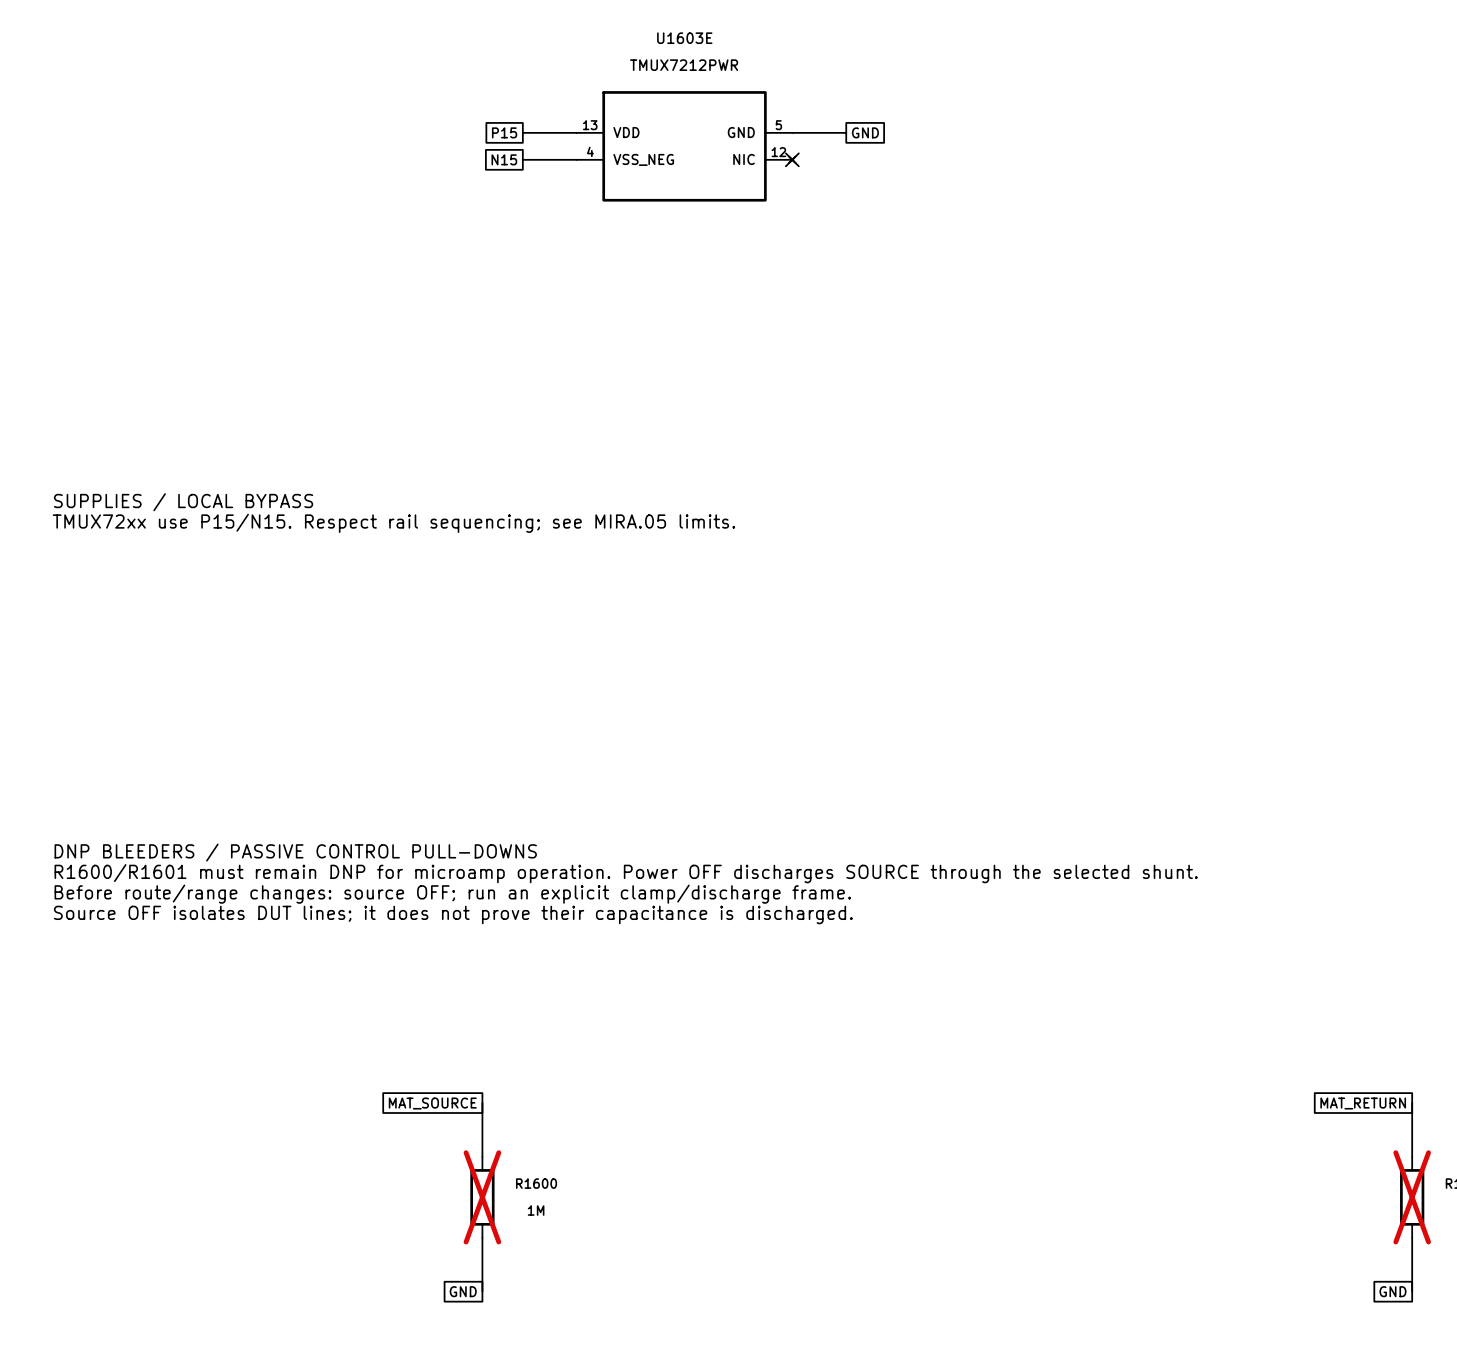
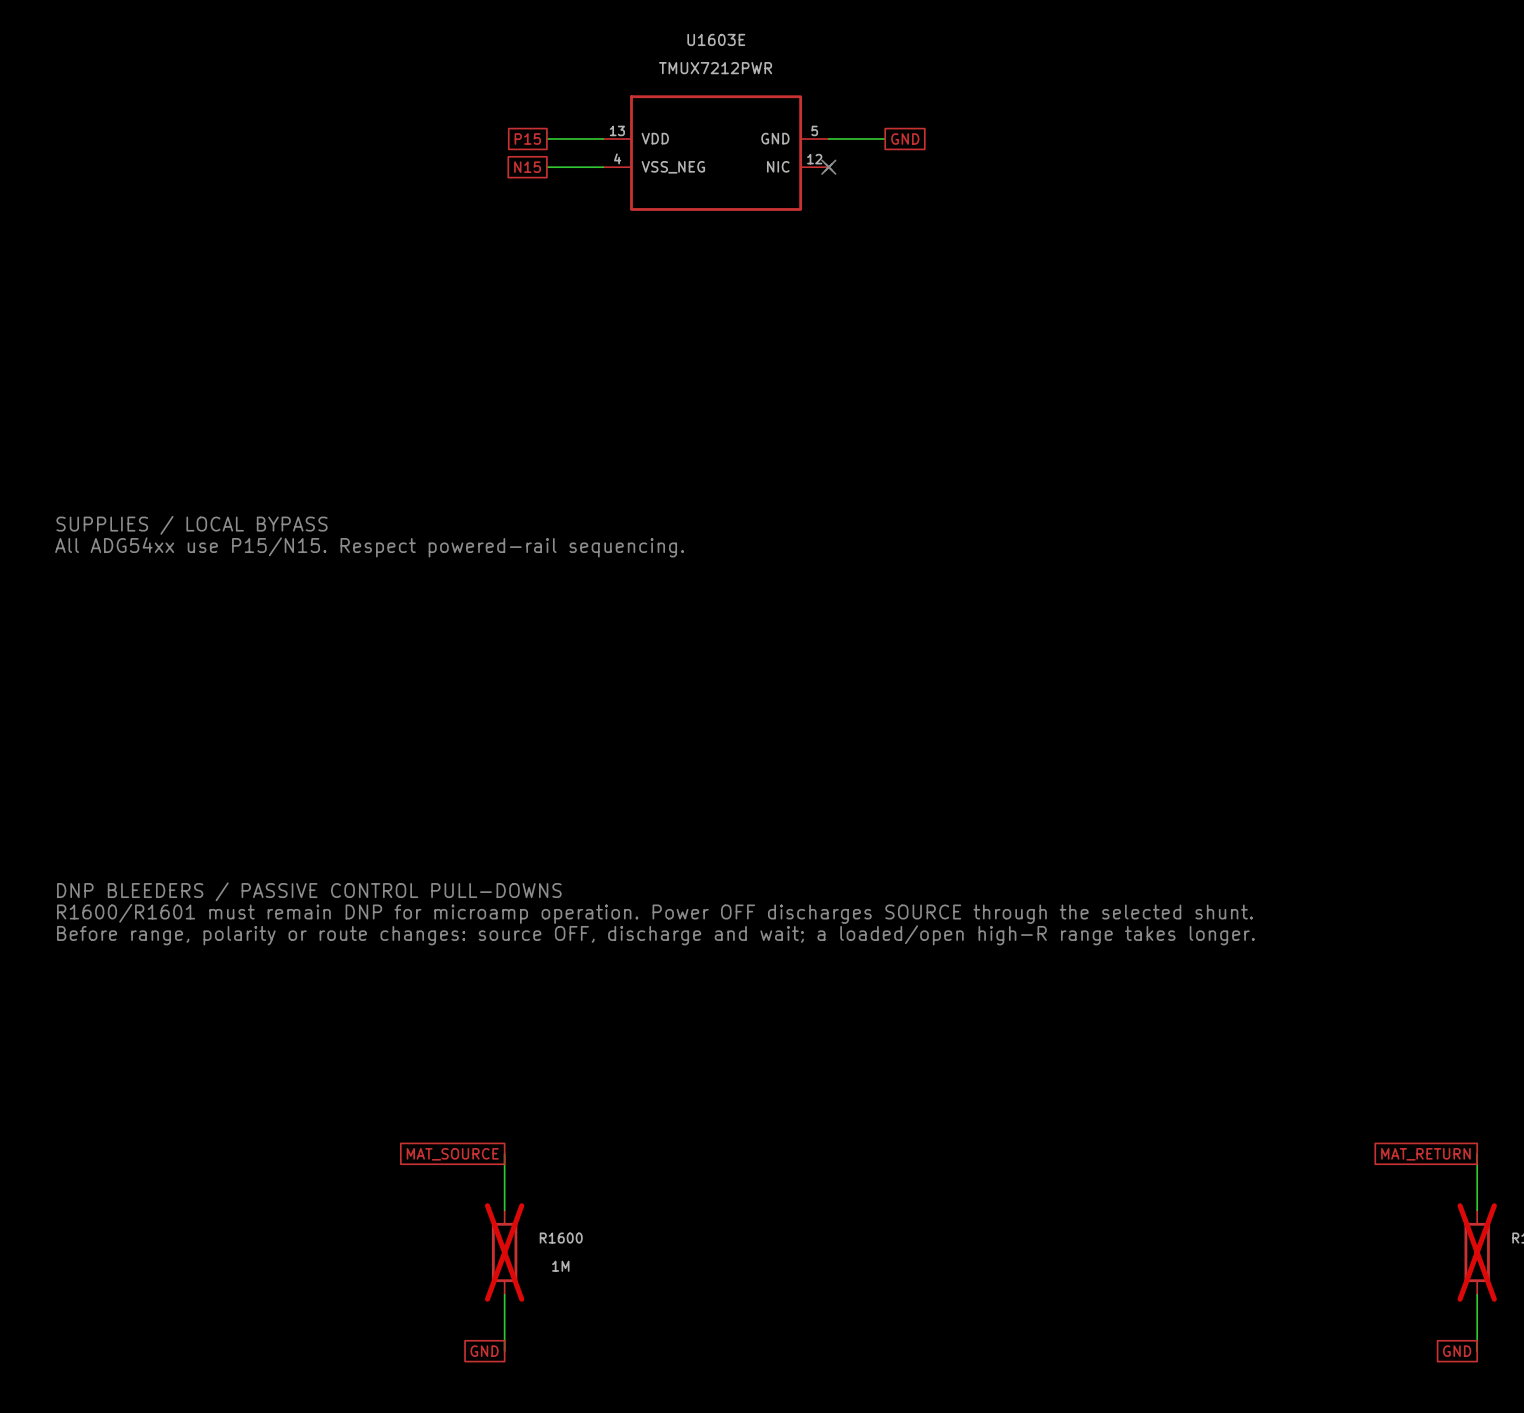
text: TMUX72xx use P15/N15. Respect rail sequencing; see MIRA.05 limits. (393, 523) -> All ADG54xx use P15/N15. Respect powered-rail sequencing. (369, 547)
text: Before route/range changes: source OFF; run an explicit clamp/discharge frame. (452, 894) -> Before range, polarity or route changes: source OFF, discharge and wait; a loaded/open high-R range takes longer. (655, 935)
text: Source OFF isolates DUT lines; it does not prove their capacitance is discharged. (453, 914) -> none

